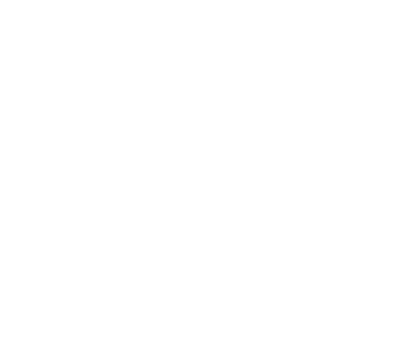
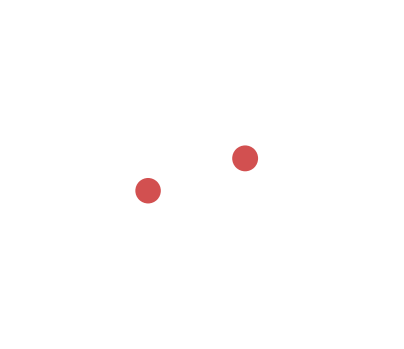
part: none -> (245, 158)
part: none -> (148, 190)

